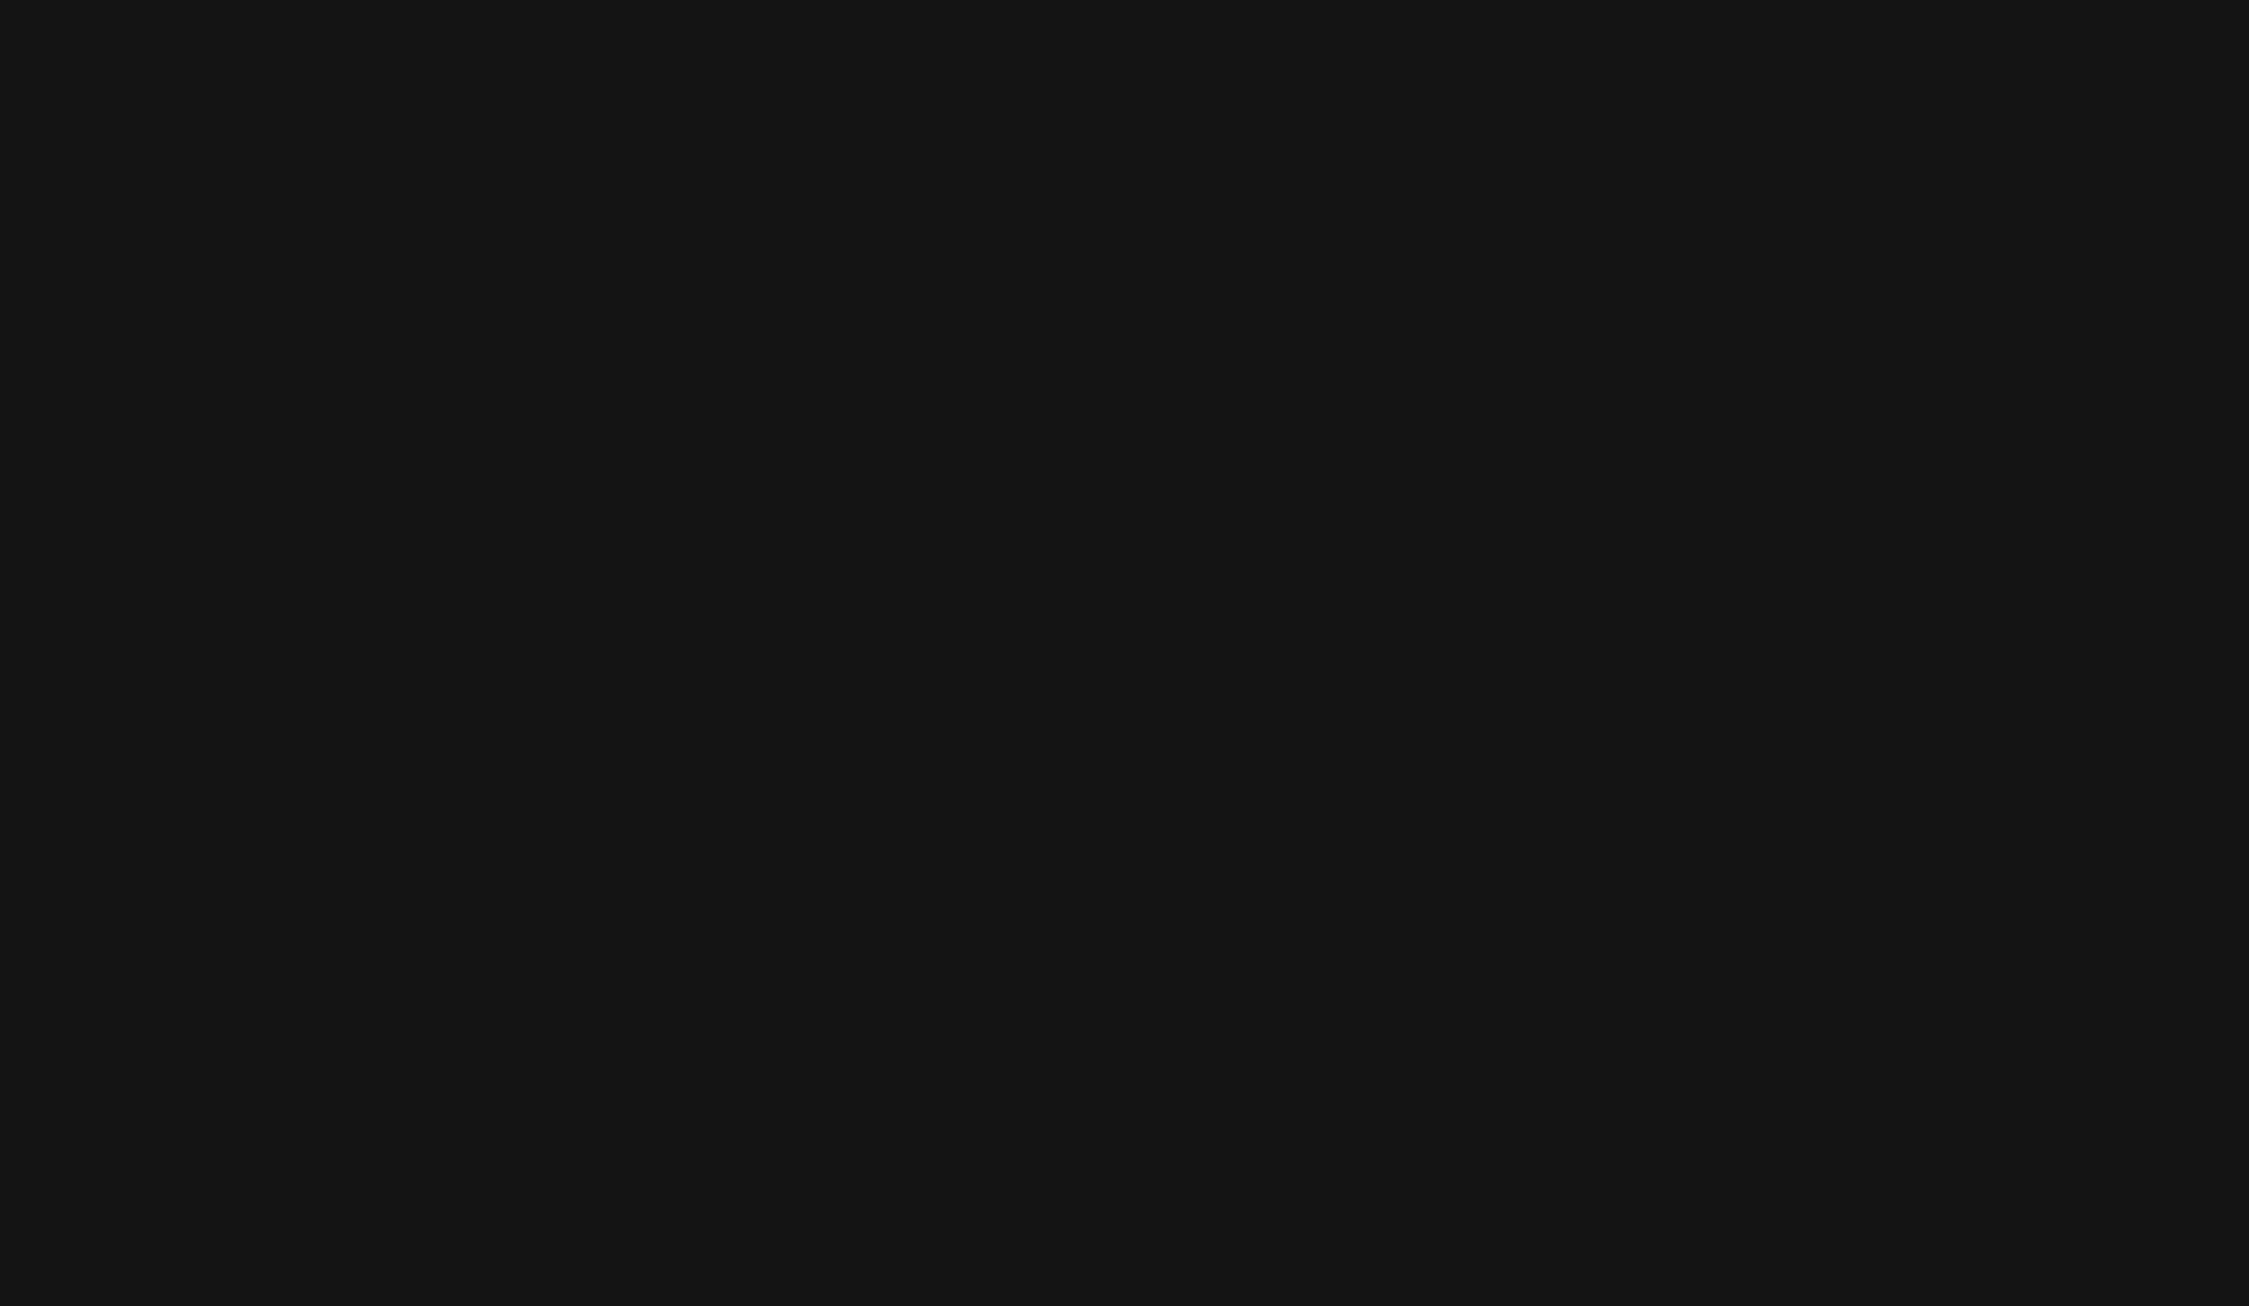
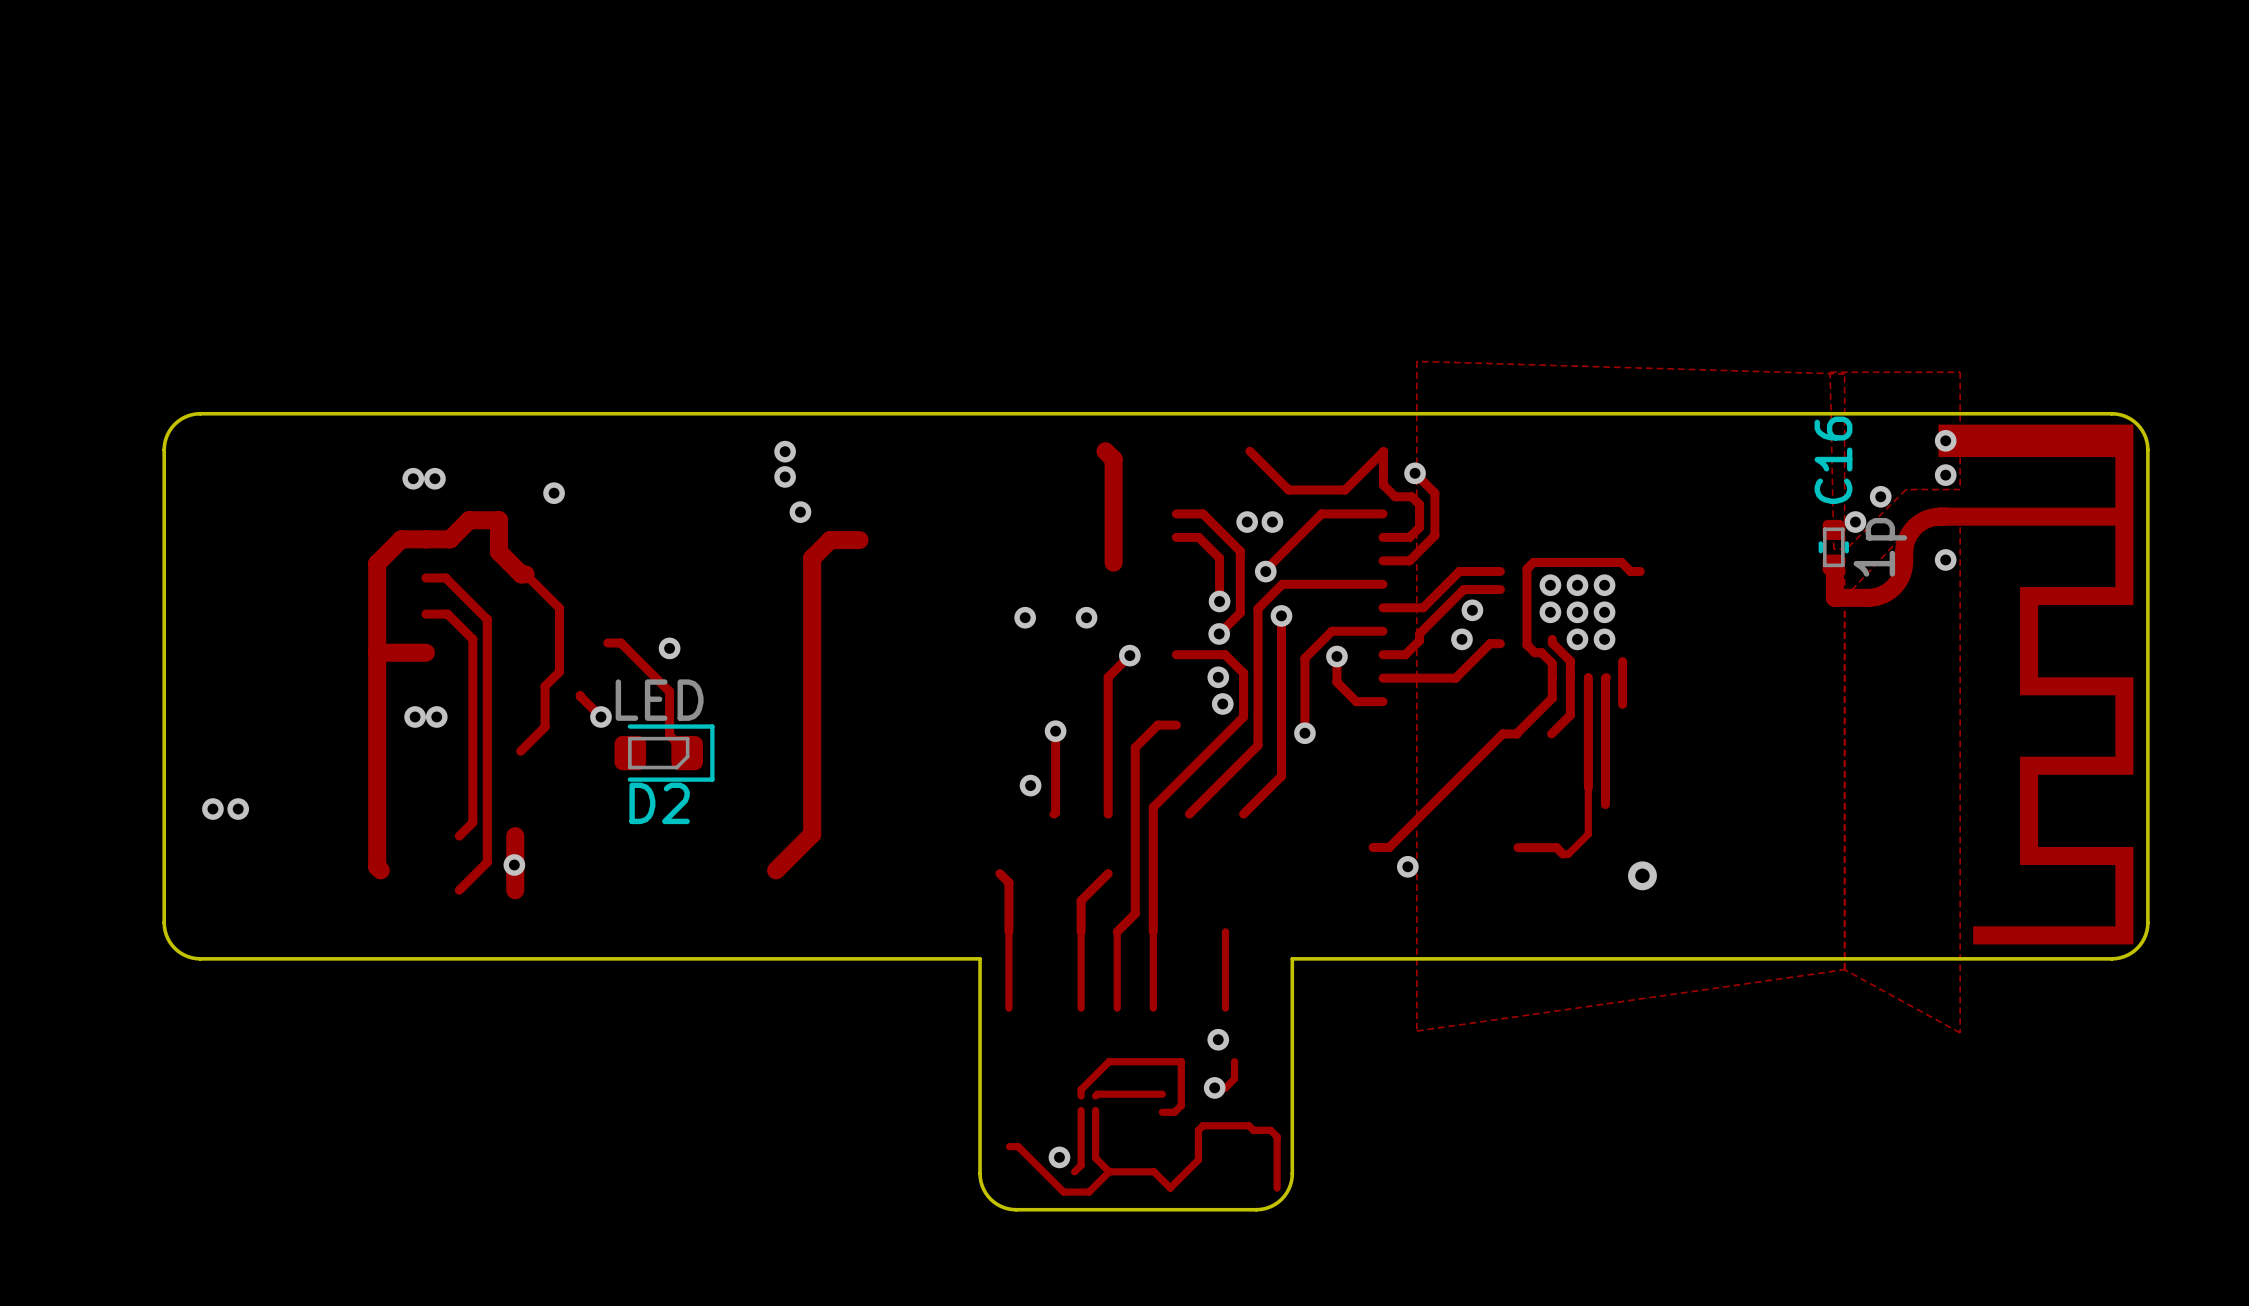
zone outline: none -> (1830, 372) (1833, 549) (1846, 549) (1905, 489) (1960, 489) (1960, 372) (1830, 372)
board edge: none -> (200, 413) (2119, 414) (2130, 419) (2139, 427) (2145, 437) (2147, 449) (2146, 930) (2142, 941) (2134, 950) (2123, 956) (2111, 958) (1292, 958) (1292, 1173) (1288, 1189) (1278, 1201) (1268, 1207) (1256, 1209) (1008, 1208) (990, 1199) (983, 1189) (980, 1177) (980, 958) (200, 958) (188, 956) (174, 948) (167, 938) (164, 922) (164, 449) (166, 437) (174, 424) (184, 417) (200, 413)
via: none -> (1945, 440)
via: none -> (785, 451)
track: none -> (1105, 451) (1113, 459) (1113, 562)
track: none -> (1249, 451) (1288, 490) (1345, 490) (1383, 451) (1383, 485) (1395, 496) (1411, 496) (1419, 504) (1419, 527) (1409, 537) (1383, 537)
track: none -> (1415, 473) (1434, 493) (1434, 535) (1409, 560) (1383, 560)
via: none -> (1415, 473)
via: none -> (1945, 475)
via: none -> (785, 476)
via: none -> (413, 478)
via: none -> (434, 478)
via: none -> (554, 493)
via: none -> (1880, 496)
via: none -> (800, 512)
track: none -> (1176, 513) (1202, 513) (1240, 551) (1240, 612) (1219, 633)
track: none -> (1383, 513) (1321, 513) (1265, 571)
track: none -> (1945, 516) (1928, 518) (1912, 530) (1905, 544) (1903, 565) (1900, 577) (1893, 587) (1883, 594) (1872, 597) (1834, 597) (1833, 564)
via: none -> (1247, 522)
via: none -> (1272, 522)
via: none -> (1855, 522)
track: none -> (1176, 537) (1198, 537) (1219, 558) (1219, 601)
track: none -> (859, 540) (830, 540) (812, 558) (812, 834) (776, 870)
C16: none -> 1p (1833, 547)
via: none -> (1945, 559)
via: none -> (1265, 571)
track: none -> (1500, 571) (1459, 571) (1423, 607) (1383, 607)
track: none -> (1640, 571) (1630, 571) (1621, 562) (1533, 562) (1527, 568) (1527, 644) (1534, 652) (1541, 652) (1552, 663) (1552, 698) (1516, 733)
track: none -> (425, 578) (445, 578) (487, 619) (487, 862) (459, 890)
track: none -> (1383, 584) (1282, 584) (1258, 608) (1258, 745) (1189, 814)
via: none -> (1550, 585)
via: none -> (1577, 585)
via: none -> (1604, 585)
track: none -> (1500, 589) (1463, 589) (1419, 633) (1419, 640) (1405, 654) (1383, 654)
zone outline: none -> (1844, 597) (1920, 516) (1960, 516) (1960, 1032) (1844, 969)
via: none -> (1219, 601)
via: none -> (1472, 610)
via: none -> (1550, 612)
via: none -> (1577, 612)
via: none -> (1604, 612)
track: none -> (425, 614) (447, 614) (472, 639) (472, 822) (459, 836)
track: none -> (1281, 615) (1281, 776) (1243, 814)
via: none -> (1281, 615)
via: none -> (1025, 617)
via: none -> (1086, 617)
track: none -> (1383, 631) (1332, 631) (1304, 658) (1304, 733)
via: none -> (1219, 633)
via: none -> (1461, 639)
track: none -> (1552, 639) (1552, 642) (1570, 661) (1570, 715) (1551, 733)
via: none -> (1577, 639)
via: none -> (1604, 639)
track: none -> (607, 642) (620, 642) (669, 691) (669, 735) (687, 753)
track: none -> (1500, 643) (1490, 643) (1455, 678) (1383, 678)
via: none -> (669, 648)
track: none -> (377, 652) (425, 652)
track: none -> (1176, 654) (1225, 654) (1243, 673) (1243, 716) (1153, 807) (1153, 1008)
track: none -> (1129, 655) (1108, 677) (1108, 814)
via: none -> (1129, 655)
track: none -> (1336, 656) (1336, 682) (1356, 701) (1383, 701)
via: none -> (1336, 656)
track: none -> (1622, 661) (1622, 704)
via: none -> (1218, 677)
track: none -> (1588, 677) (1588, 787)
track: none -> (1606, 677) (1605, 804)
part: none -> (2035, 684)
track: none -> (580, 695) (601, 716)
via: none -> (1222, 703)
via: none -> (415, 716)
via: none -> (436, 716)
via: none -> (601, 716)
track: none -> (1176, 725) (1157, 725) (1135, 747) (1135, 913) (1117, 931) (1117, 1008)
track: none -> (1055, 731) (1055, 812) (1054, 814)
via: none -> (1055, 731)
via: none -> (1304, 733)
track: none -> (1516, 733) (1502, 733) (1389, 847) (1373, 847)
track: none -> (520, 751) (545, 726) (545, 686) (559, 671) (559, 608) (525, 574) (521, 574) (499, 552) (499, 520) (469, 520) (450, 539) (401, 539) (377, 563) (377, 866) (380, 870)
D2: none -> LED (664, 753)
via: none -> (1030, 785)
track: none -> (1588, 789) (1588, 834) (1568, 854) (1563, 854) (1556, 847) (1517, 847)
via: none -> (212, 809)
via: none -> (238, 809)
track: none -> (515, 836) (515, 890)
via: none -> (514, 864)
via: none -> (1407, 866)
track: none -> (999, 873) (1008, 882) (1008, 1008)
track: none -> (1108, 873) (1081, 900) (1081, 1008)
via: none -> (1642, 875)
track: none -> (1225, 931) (1225, 1008)
zone outline: none -> (1844, 969) (1416, 1031) (1416, 361) (1844, 374) (1844, 969)
via: none -> (1218, 1039)
track: none -> (1234, 1061) (1234, 1078) (1225, 1087) (1214, 1087)
via: none -> (1214, 1087)
track: none -> (1162, 1094) (1097, 1094) (1095, 1096)
track: none -> (1081, 1096) (1081, 1089) (1109, 1061) (1181, 1061) (1181, 1105) (1174, 1112) (1162, 1112)
track: none -> (1081, 1110) (1081, 1165) (1074, 1171)
track: none -> (1095, 1110) (1095, 1158) (1109, 1171)
track: none -> (1009, 1146) (1018, 1146) (1063, 1192) (1089, 1192) (1109, 1171)
via: none -> (1059, 1157)
track: none -> (1109, 1171) (1154, 1171) (1170, 1188) (1198, 1159) (1198, 1130) (1202, 1125) (1248, 1125) (1253, 1130) (1270, 1130) (1277, 1136) (1277, 1188)

